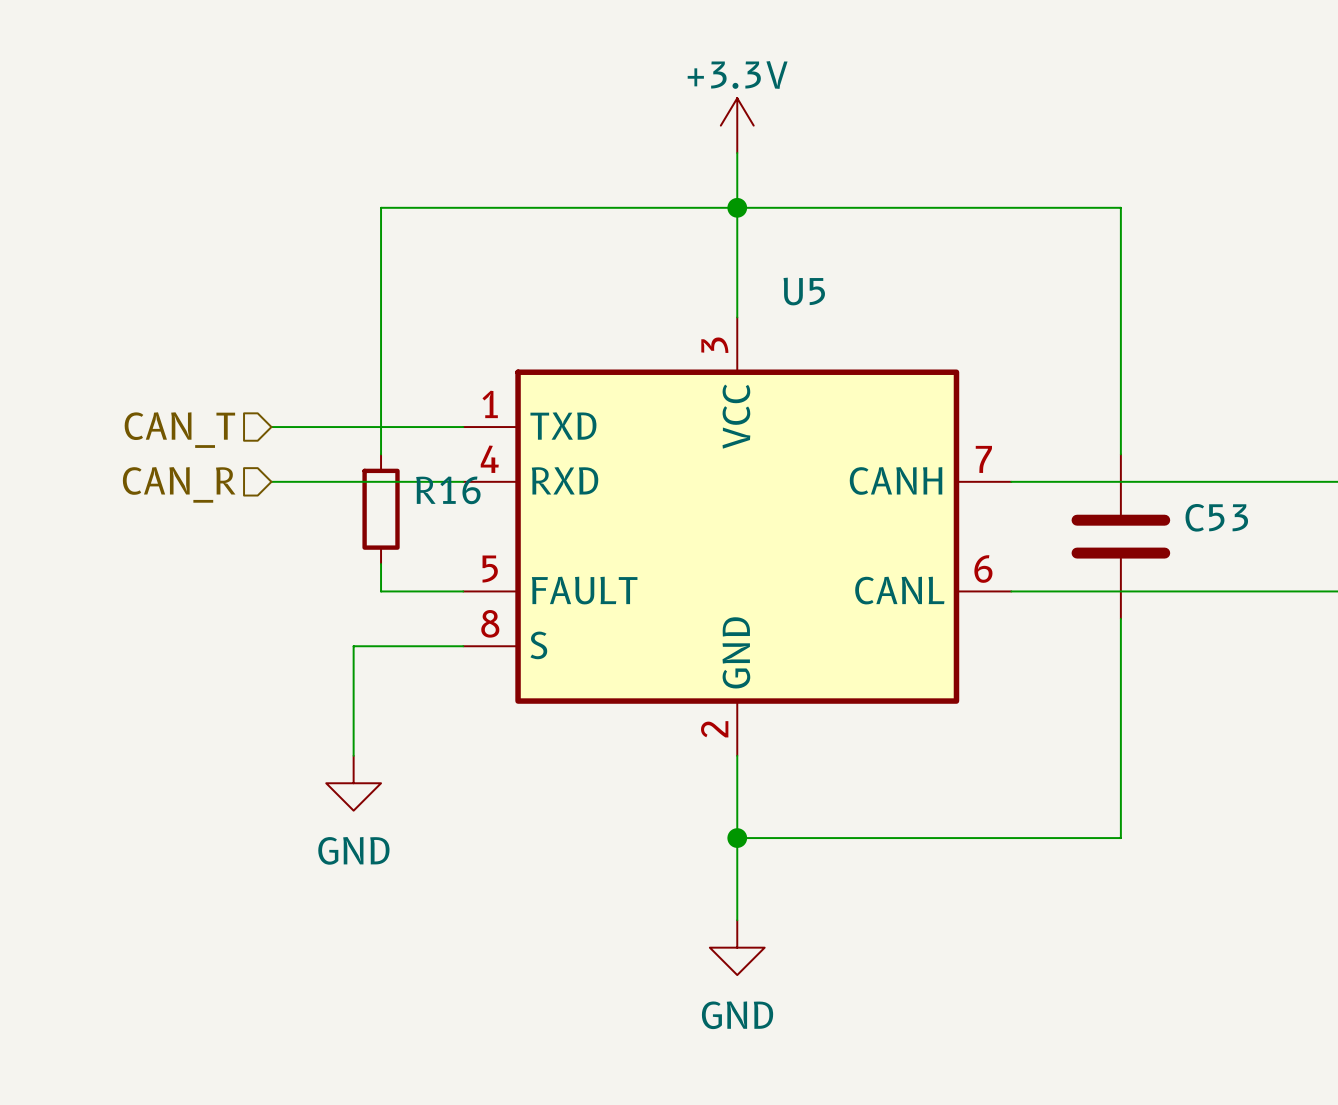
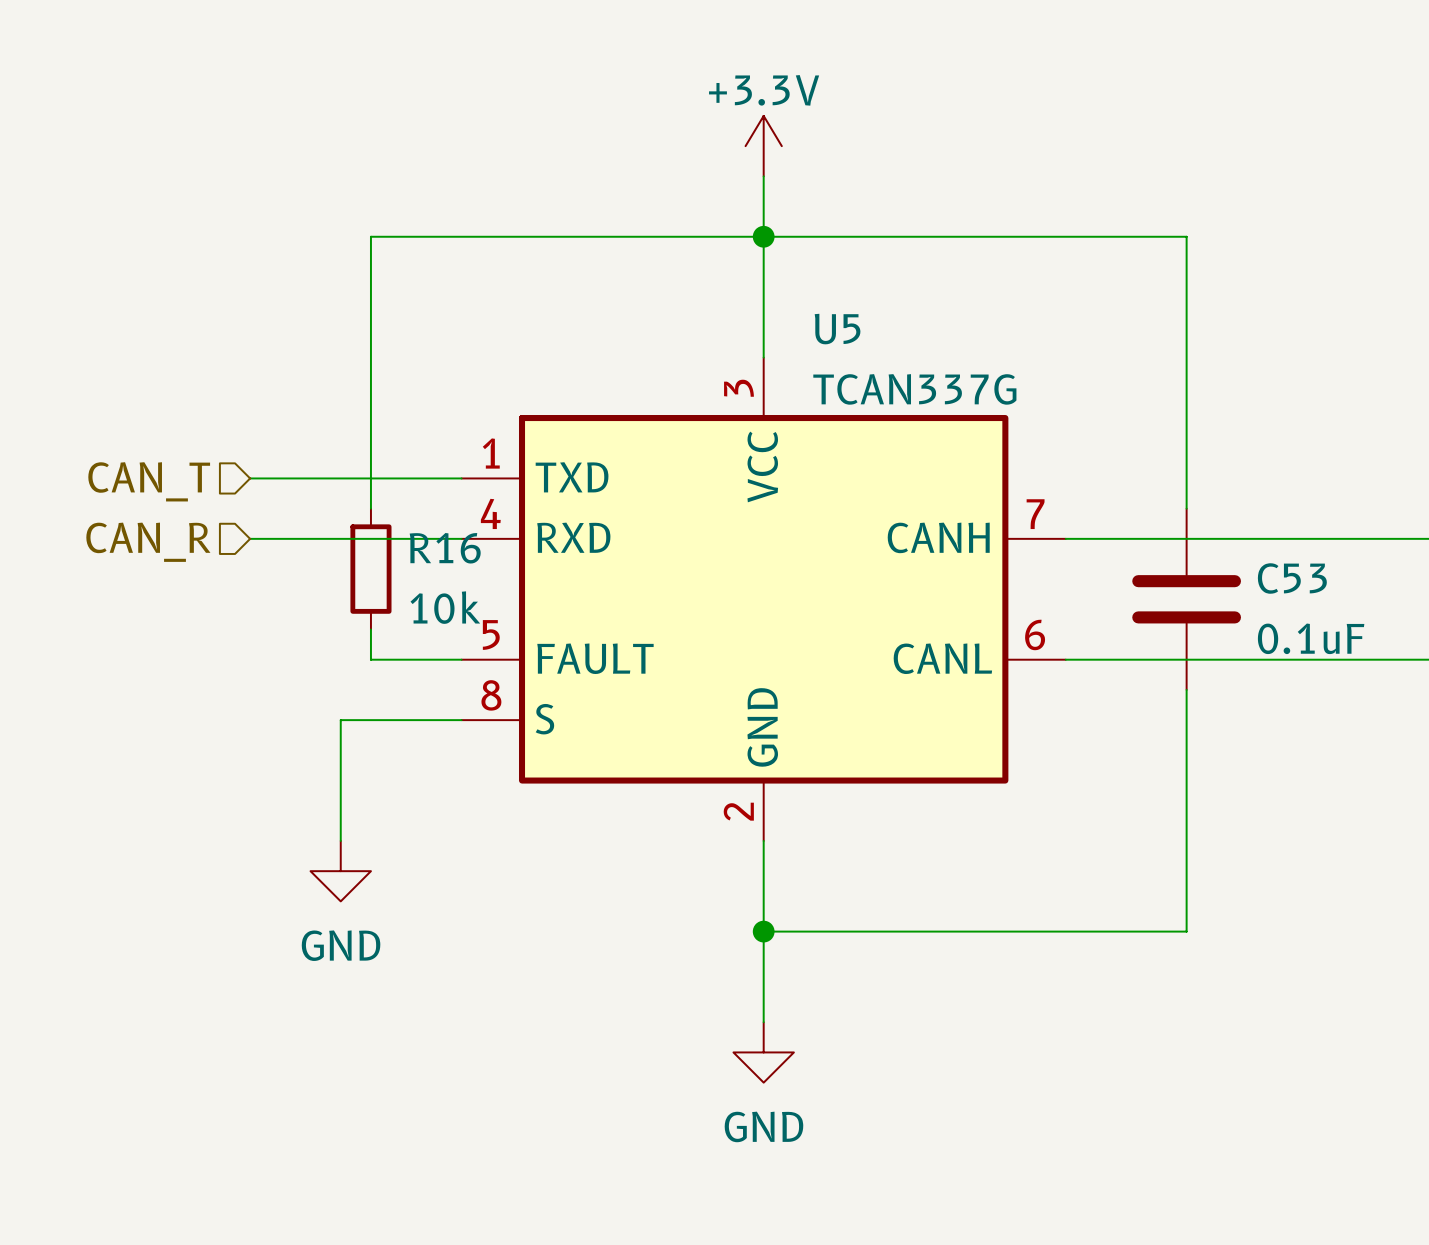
U5 value: none -> TCAN337G (914, 389)
R16 value: none -> 10k (445, 607)
C53 value: none -> 0.1uF (1311, 638)

